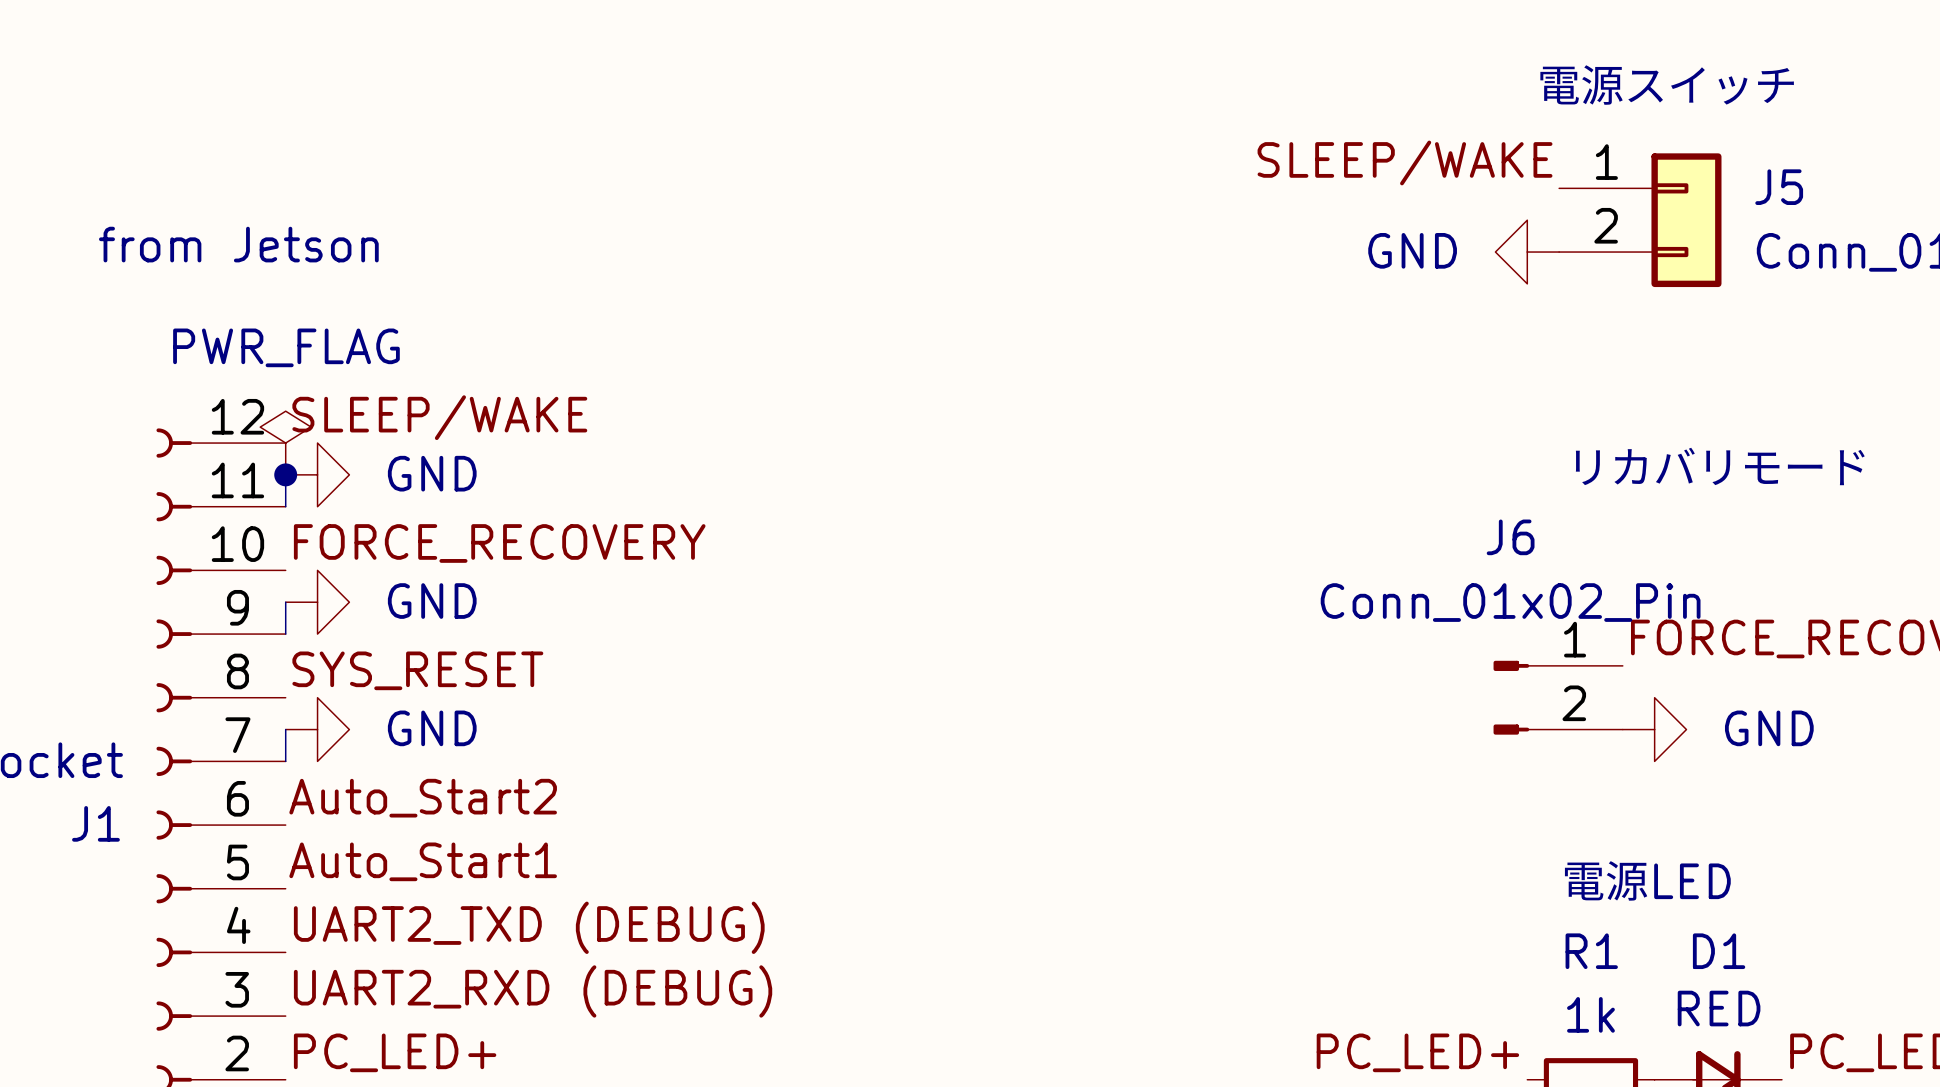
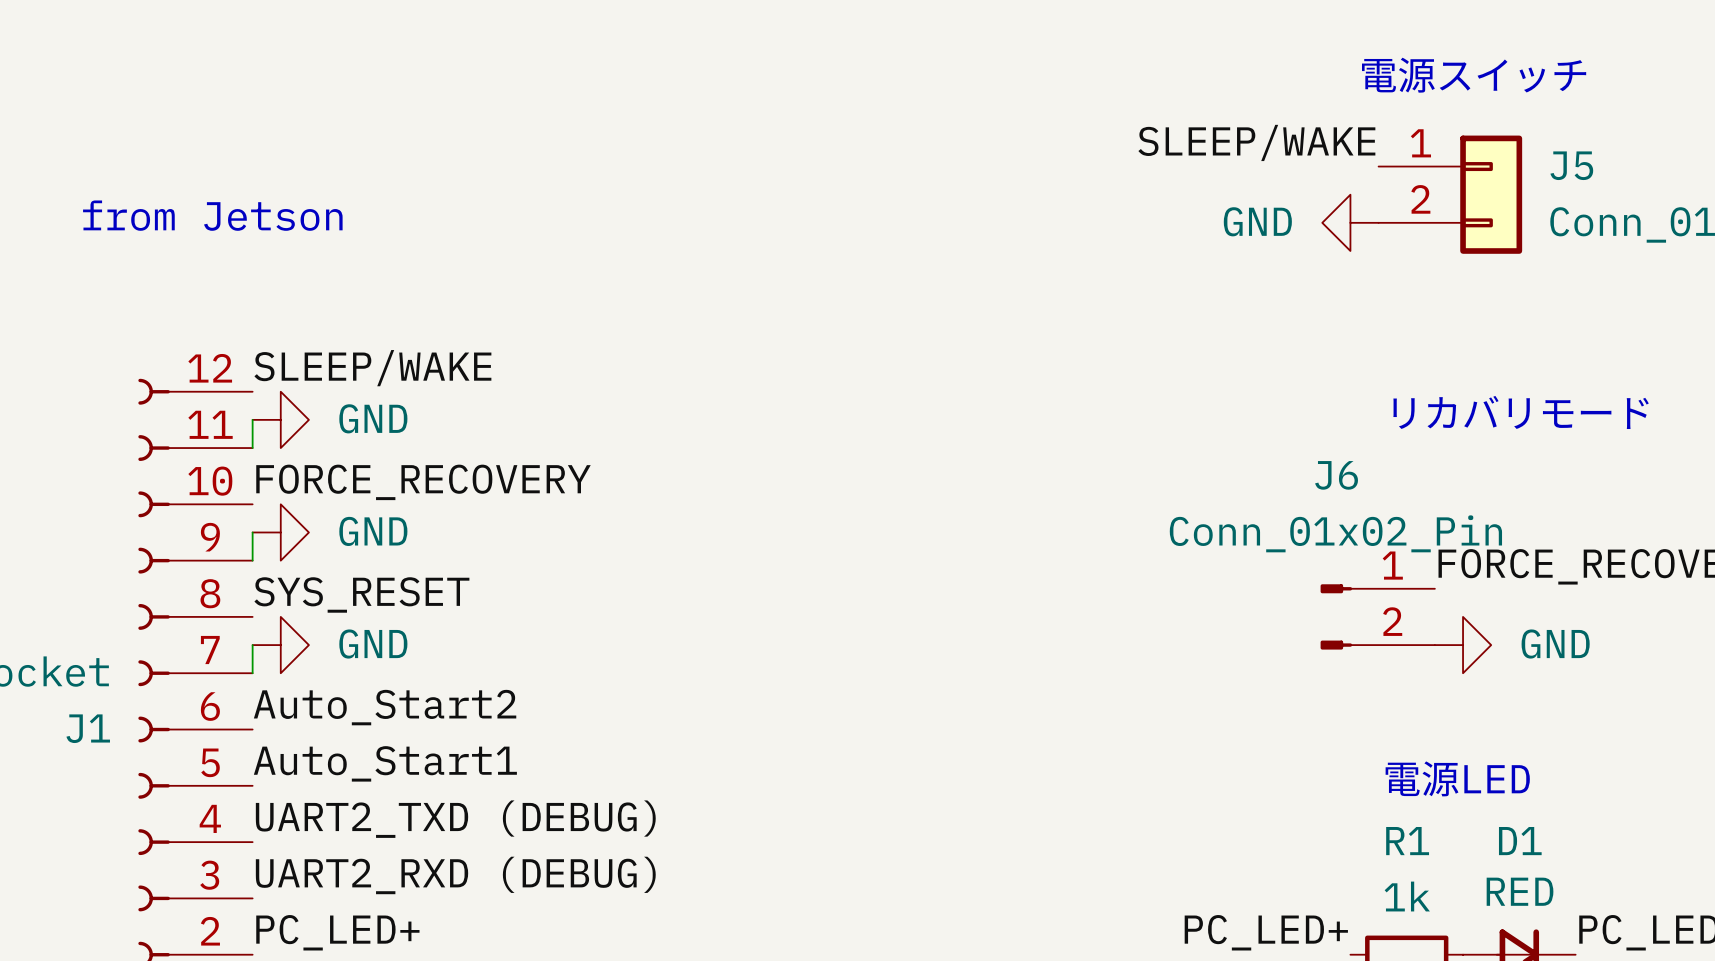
power symbol: PWR_FLAG (285, 443) -> none
junction: (285, 474) -> none

